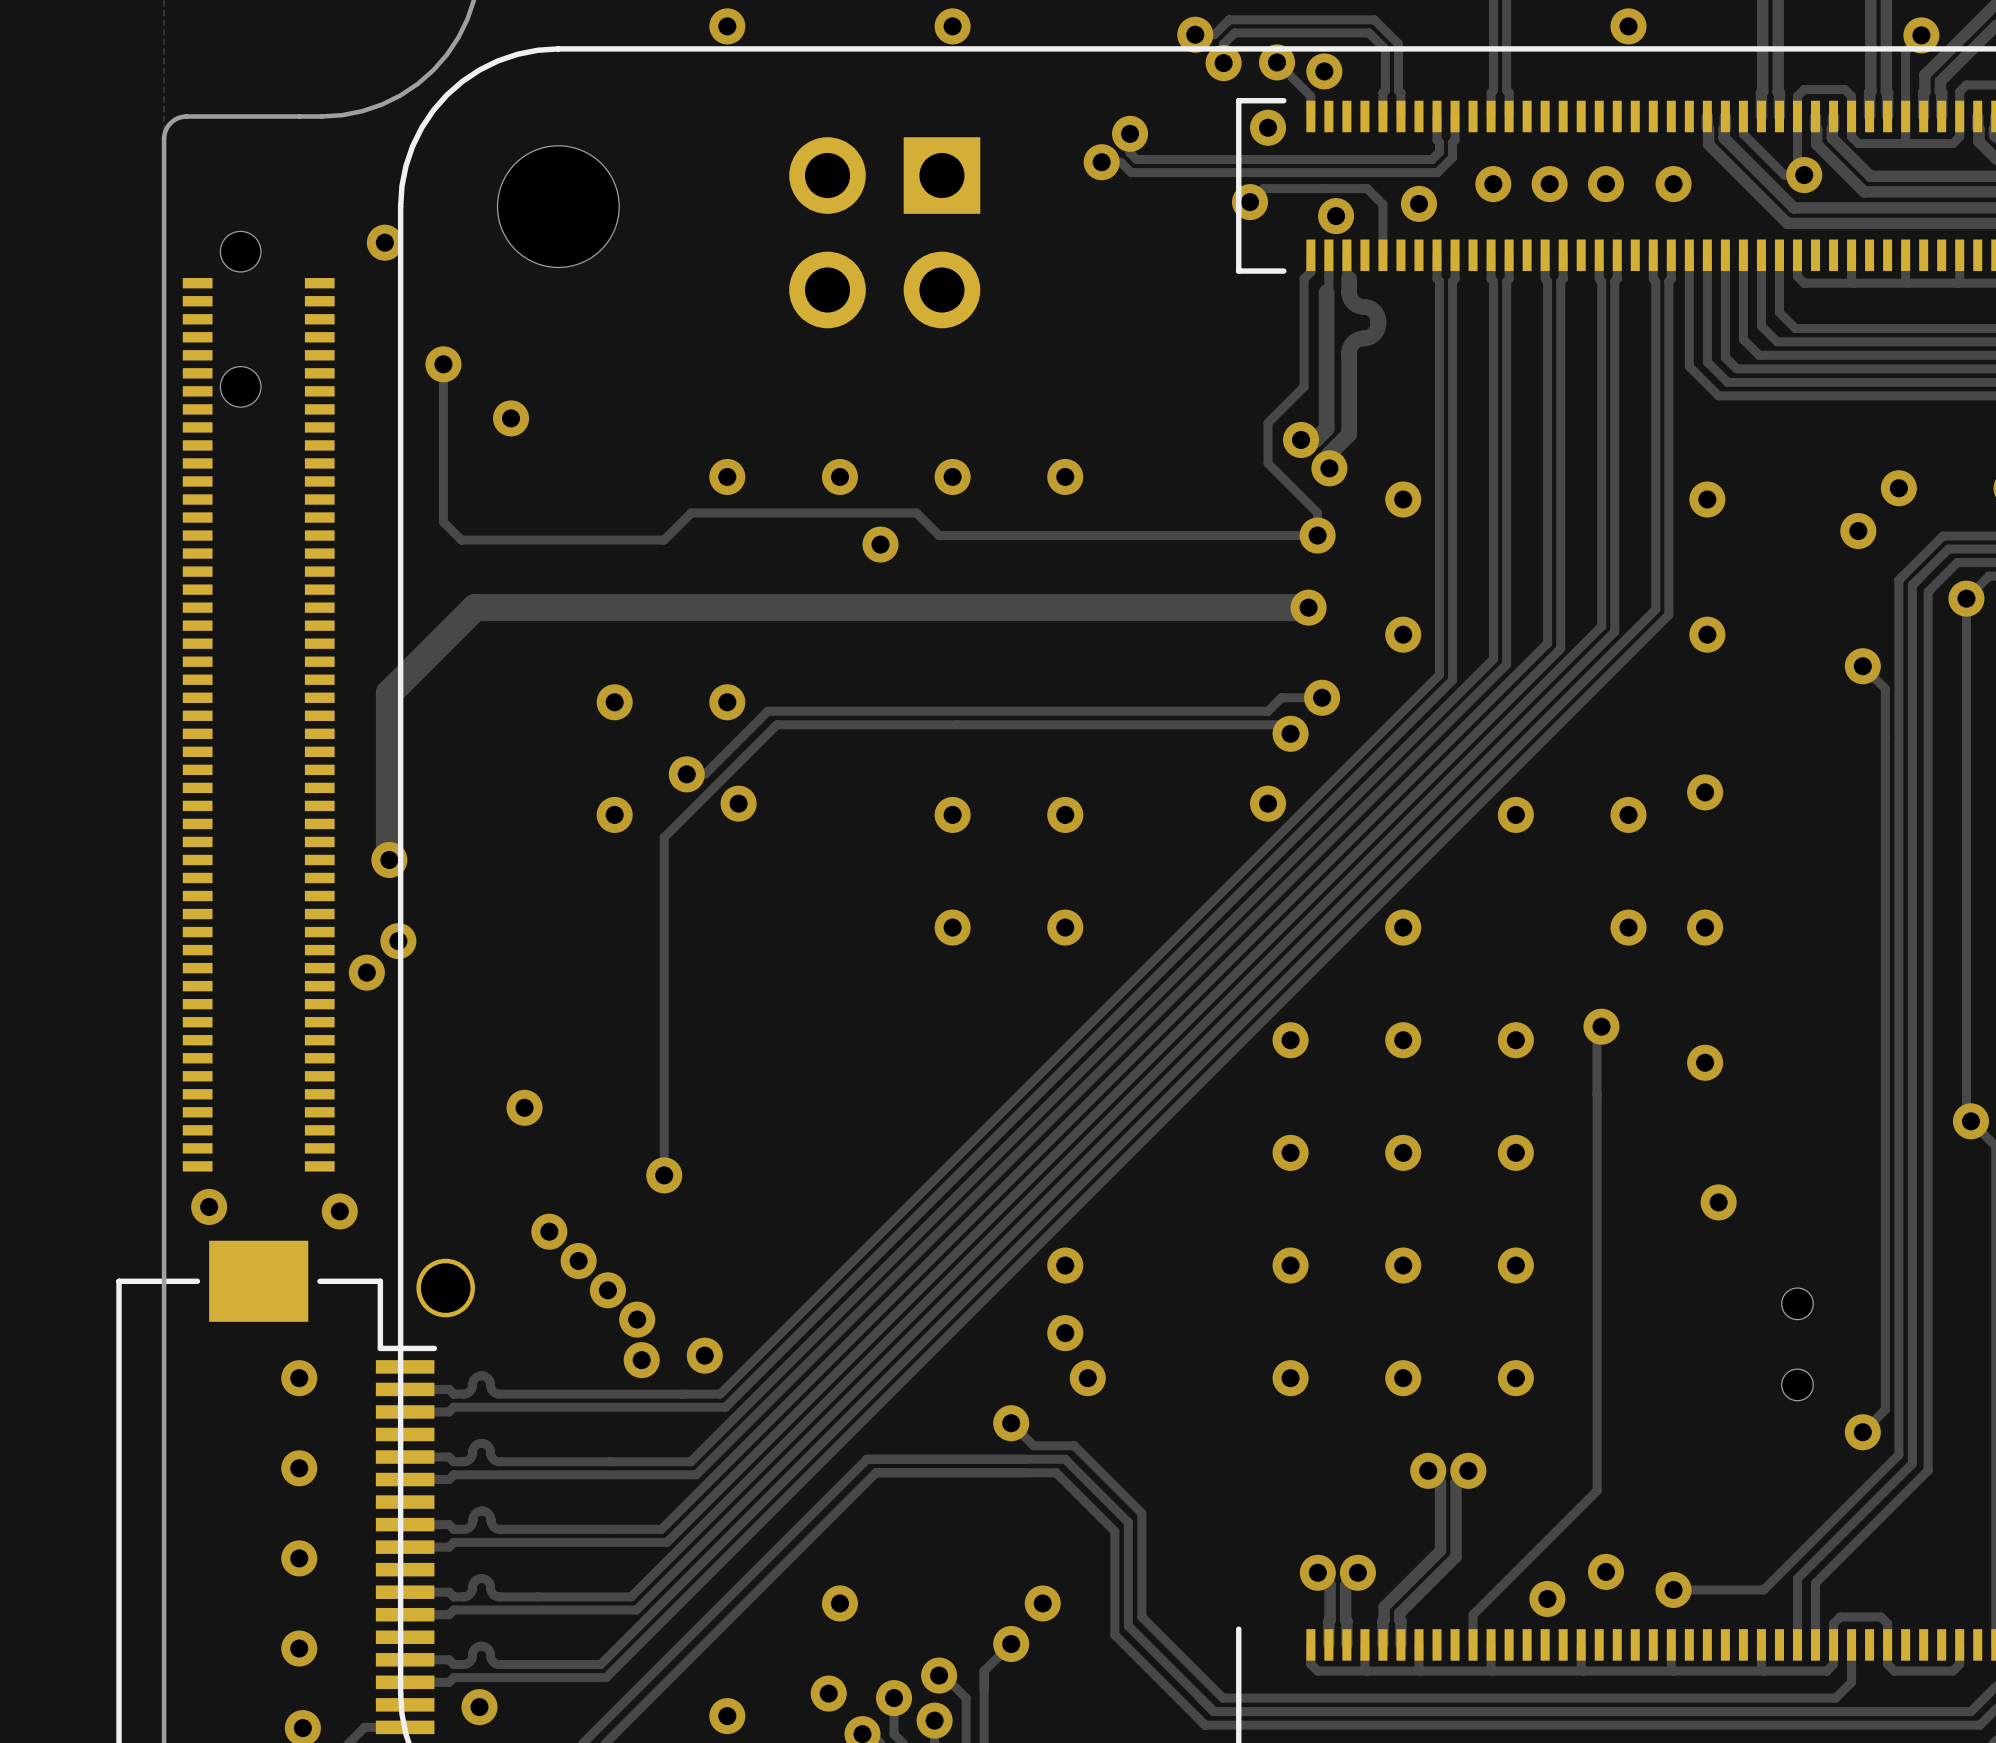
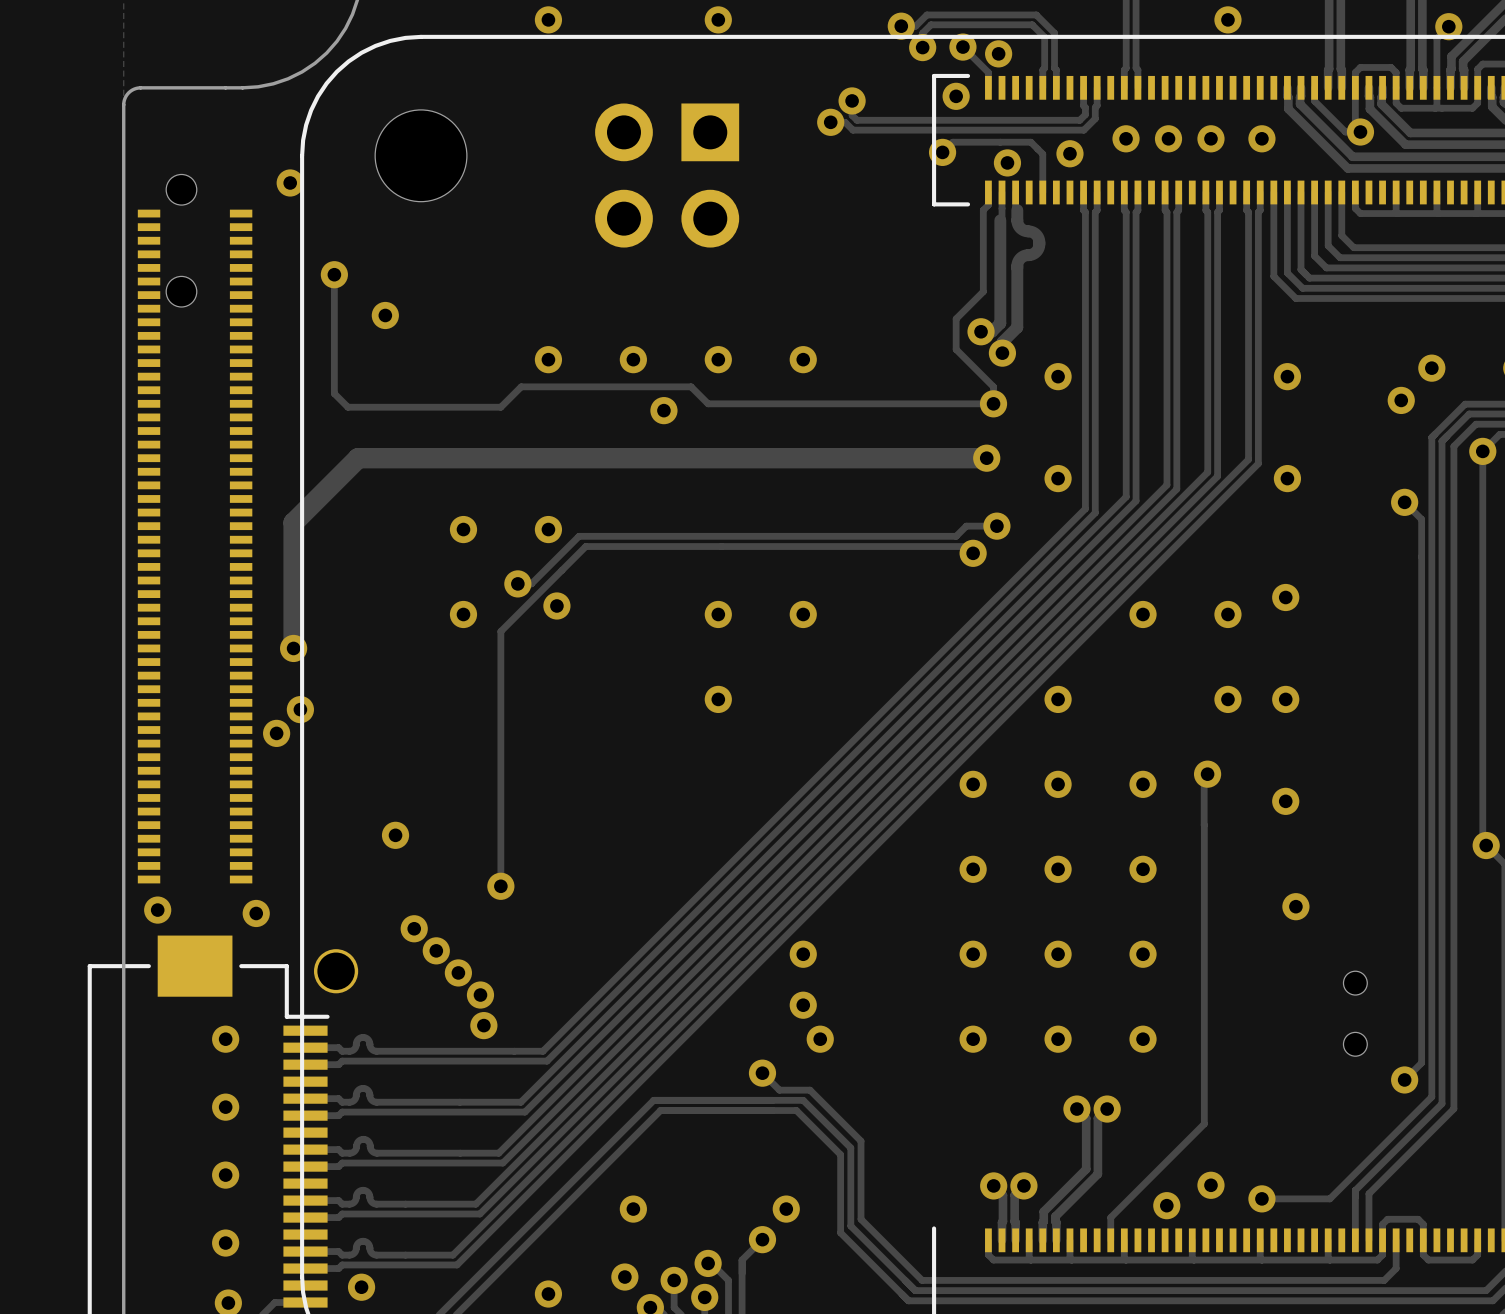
via: (1268, 803) -> none
via: (1065, 927) -> none
via: (704, 1355) -> none

